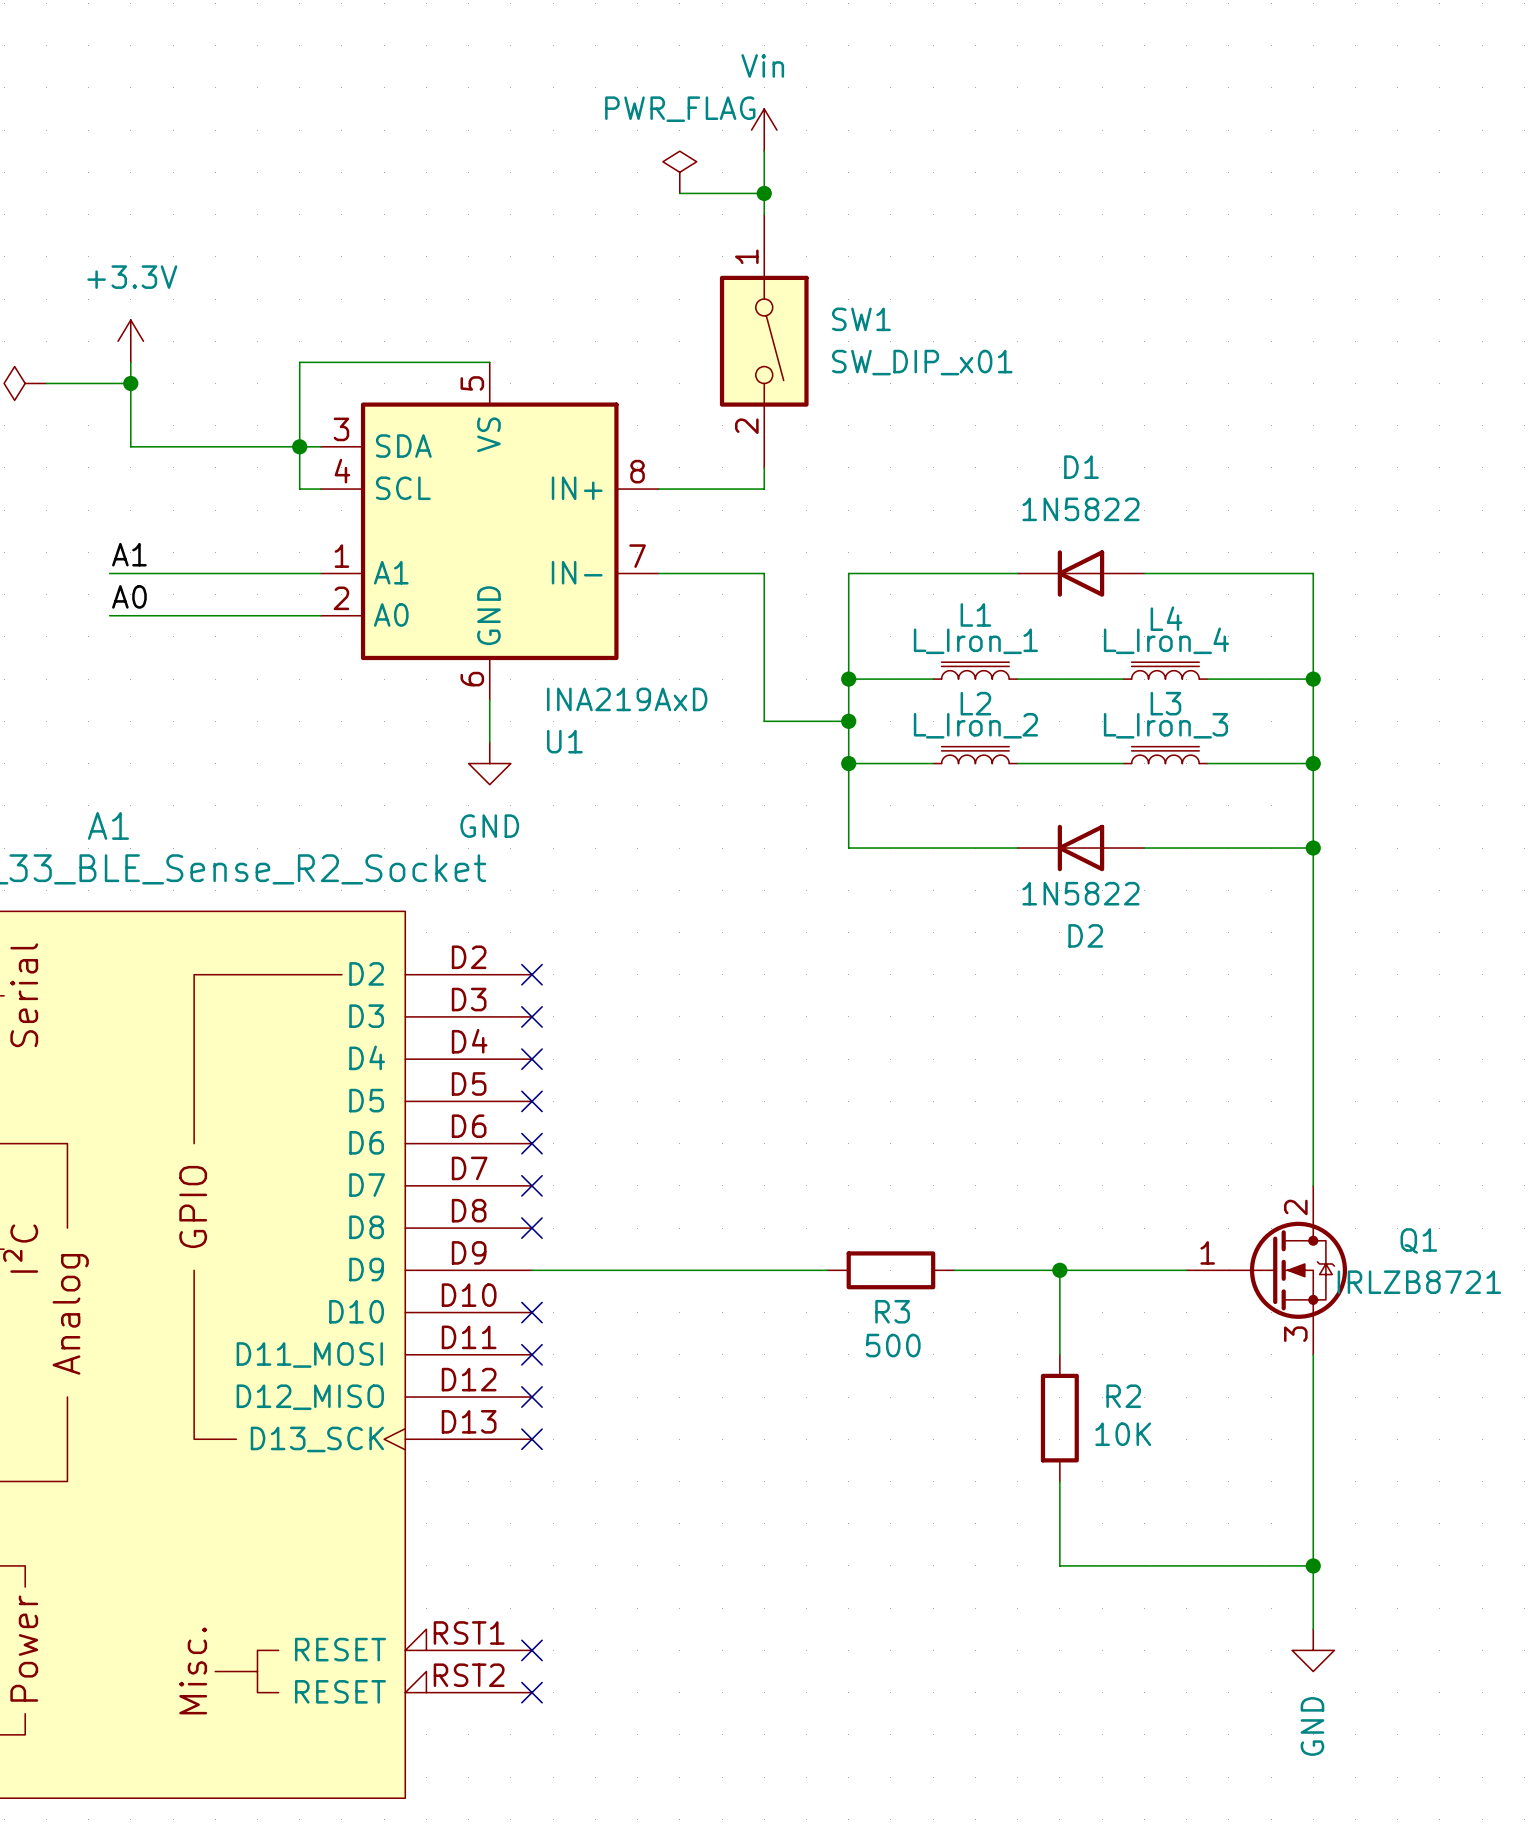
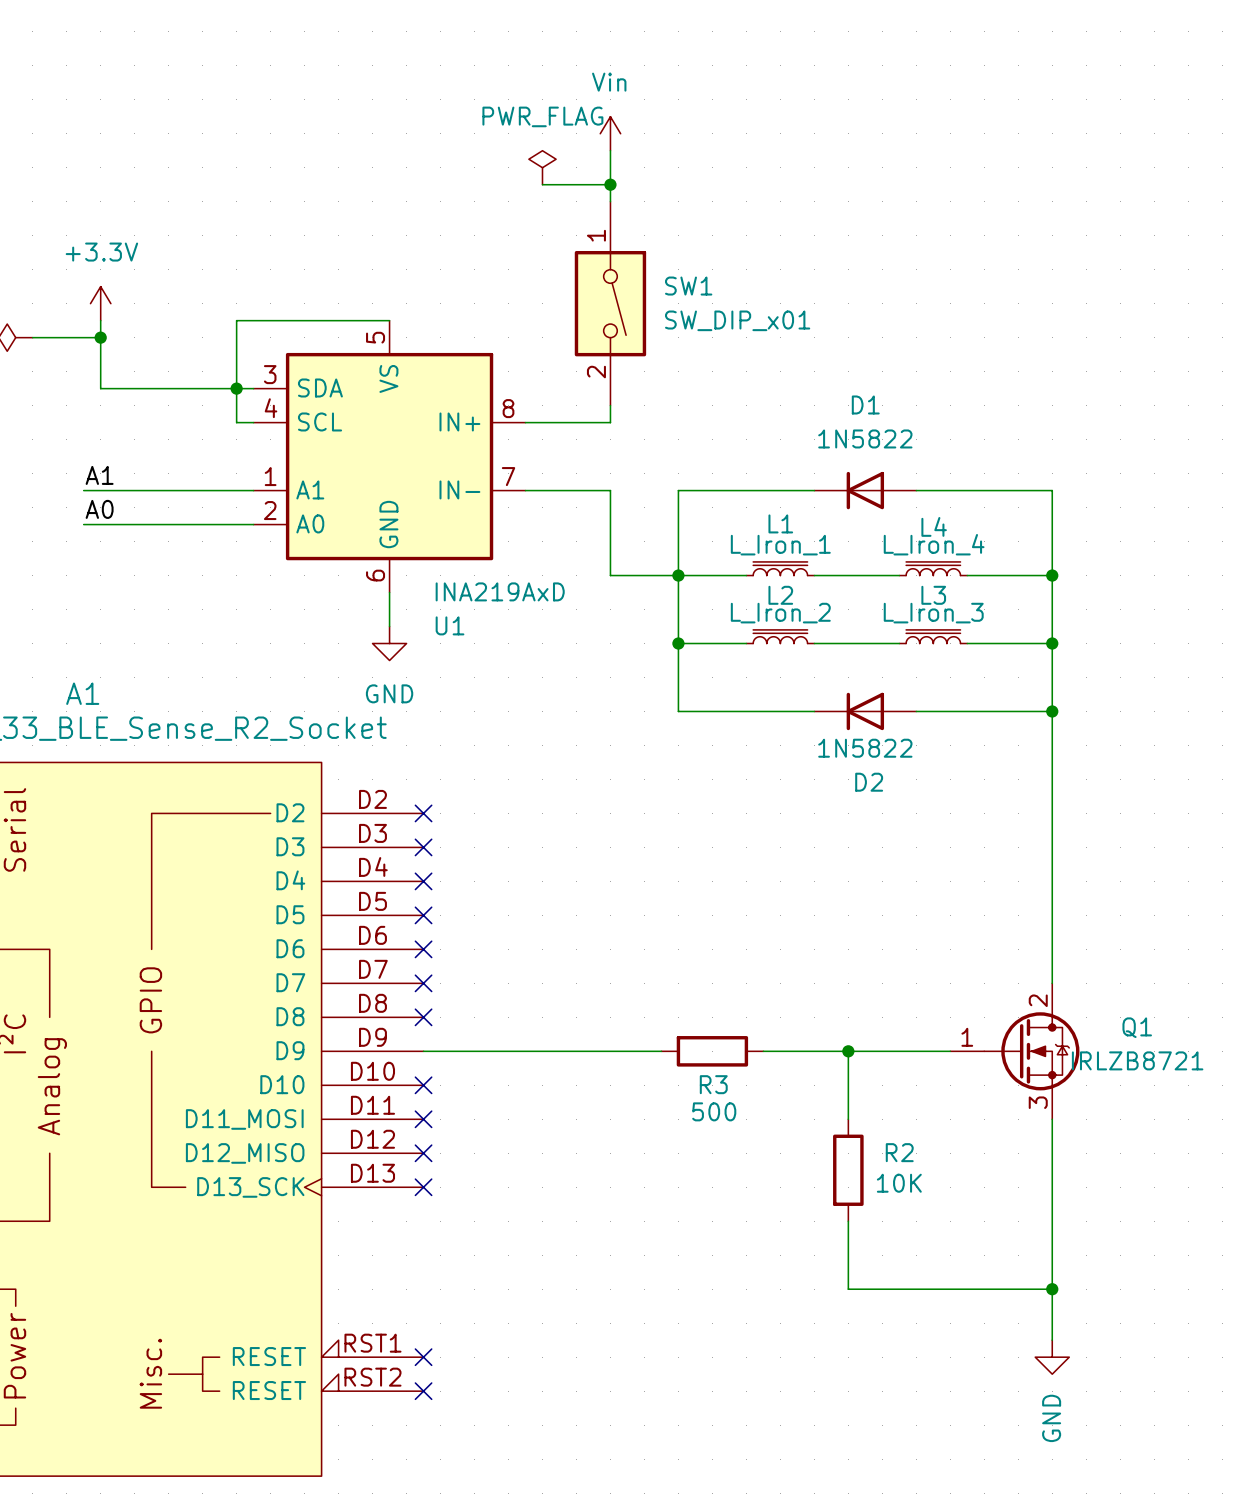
wire: (764, 679) (764, 721) (848, 721) -> (610, 575) (678, 575)
junction: (848, 721) -> none

